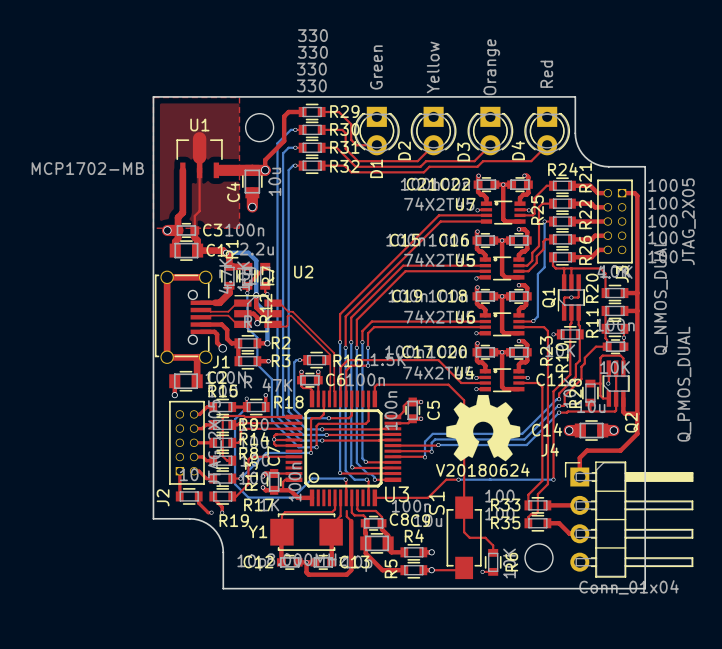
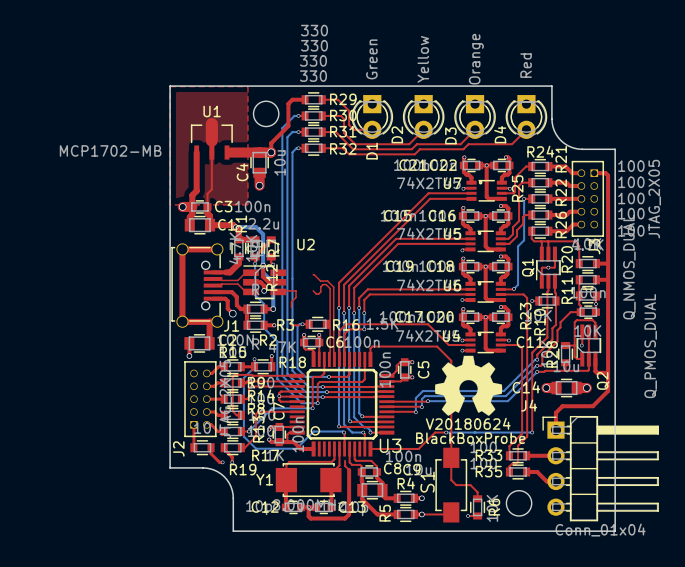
top track: (273, 303) (279, 303) (288, 311) (292, 311) (334, 353) -> (313, 274) (320, 281) (327, 281) (333, 287) (333, 318)
top track: none -> (278, 291) (296, 290) (296, 297) (291, 302) (291, 307)
top track: (280, 324) (273, 324) (275, 326) (286, 326) (287, 316) (291, 315) (330, 354) -> (313, 290) (318, 293) (323, 284) (326, 284) (330, 288) (330, 319)
R2 name position: R2 (281, 342) -> R2 (268, 340)
top track: none -> (291, 324) (299, 325)
drawing: none -> [416, 432, 526, 445]
S1 name position: S1 (436, 503) -> S1 (427, 482)

